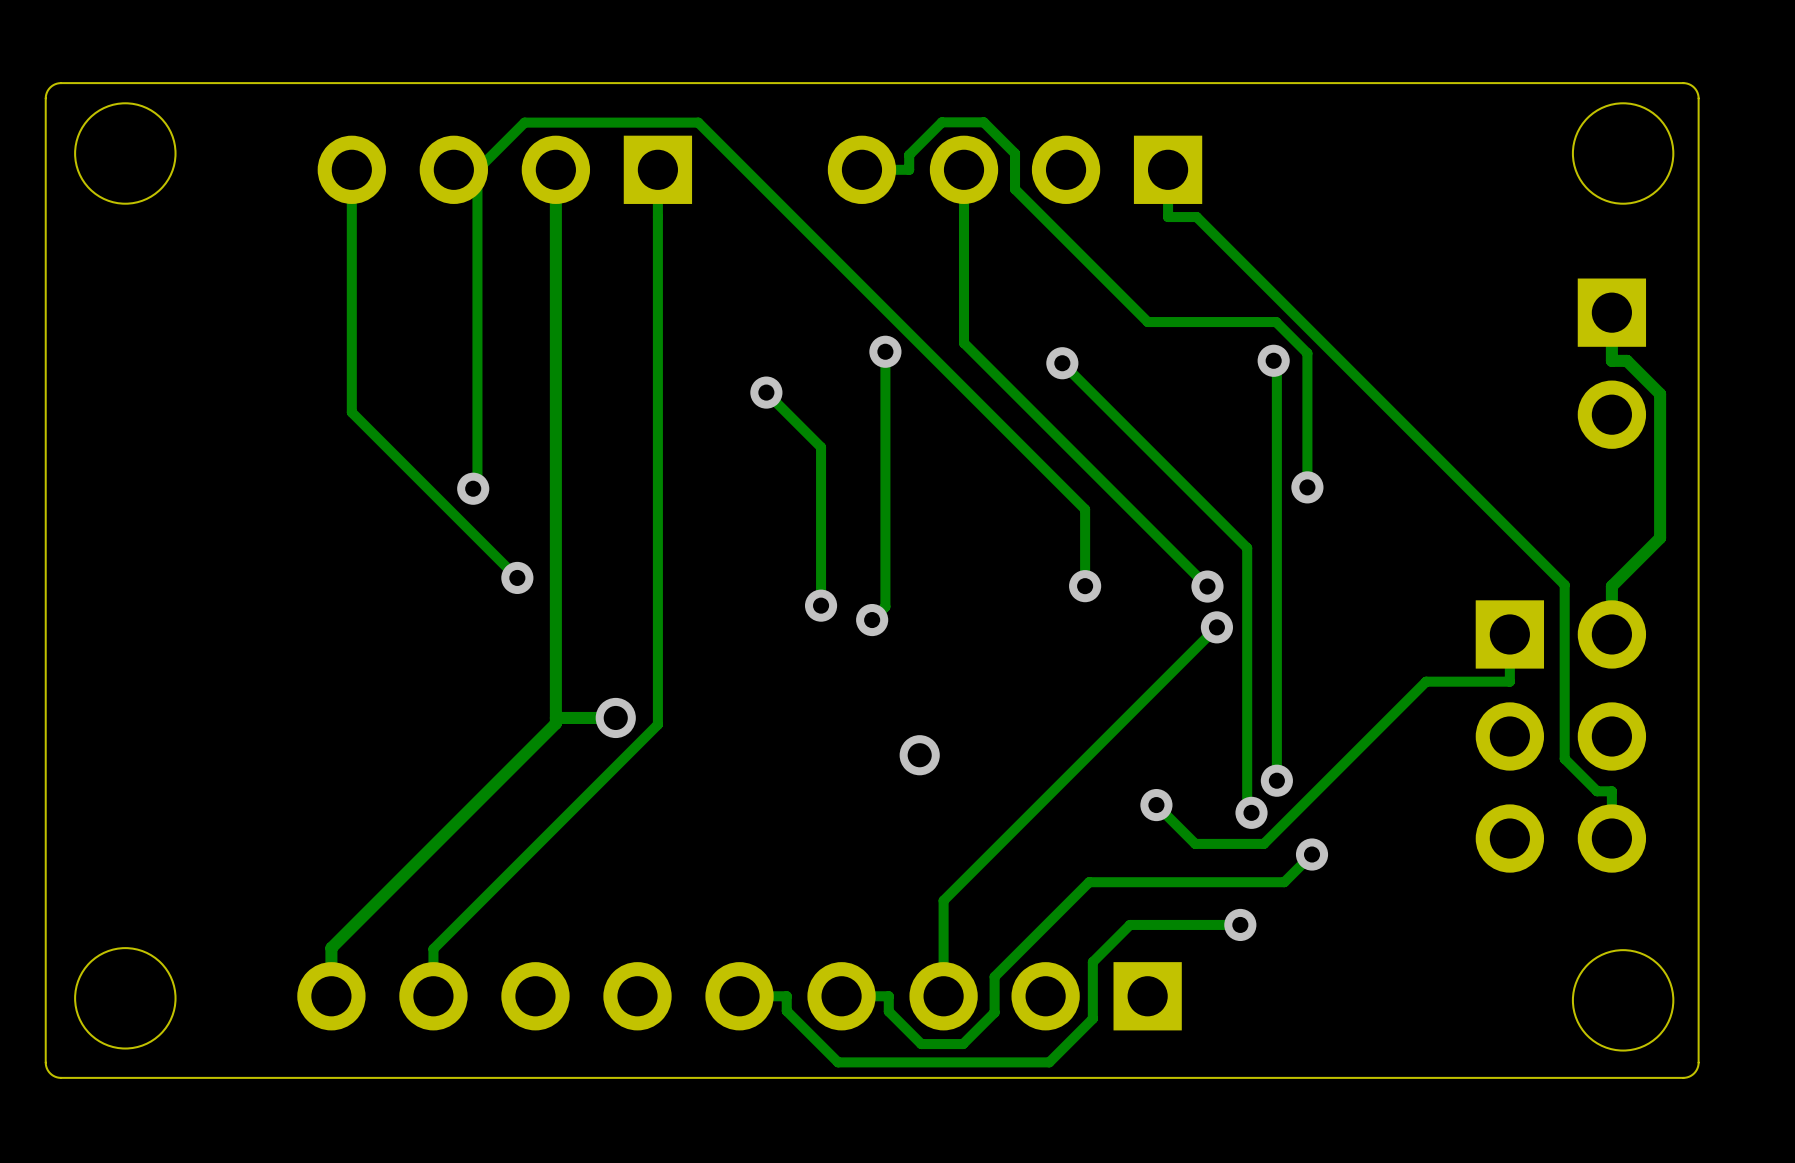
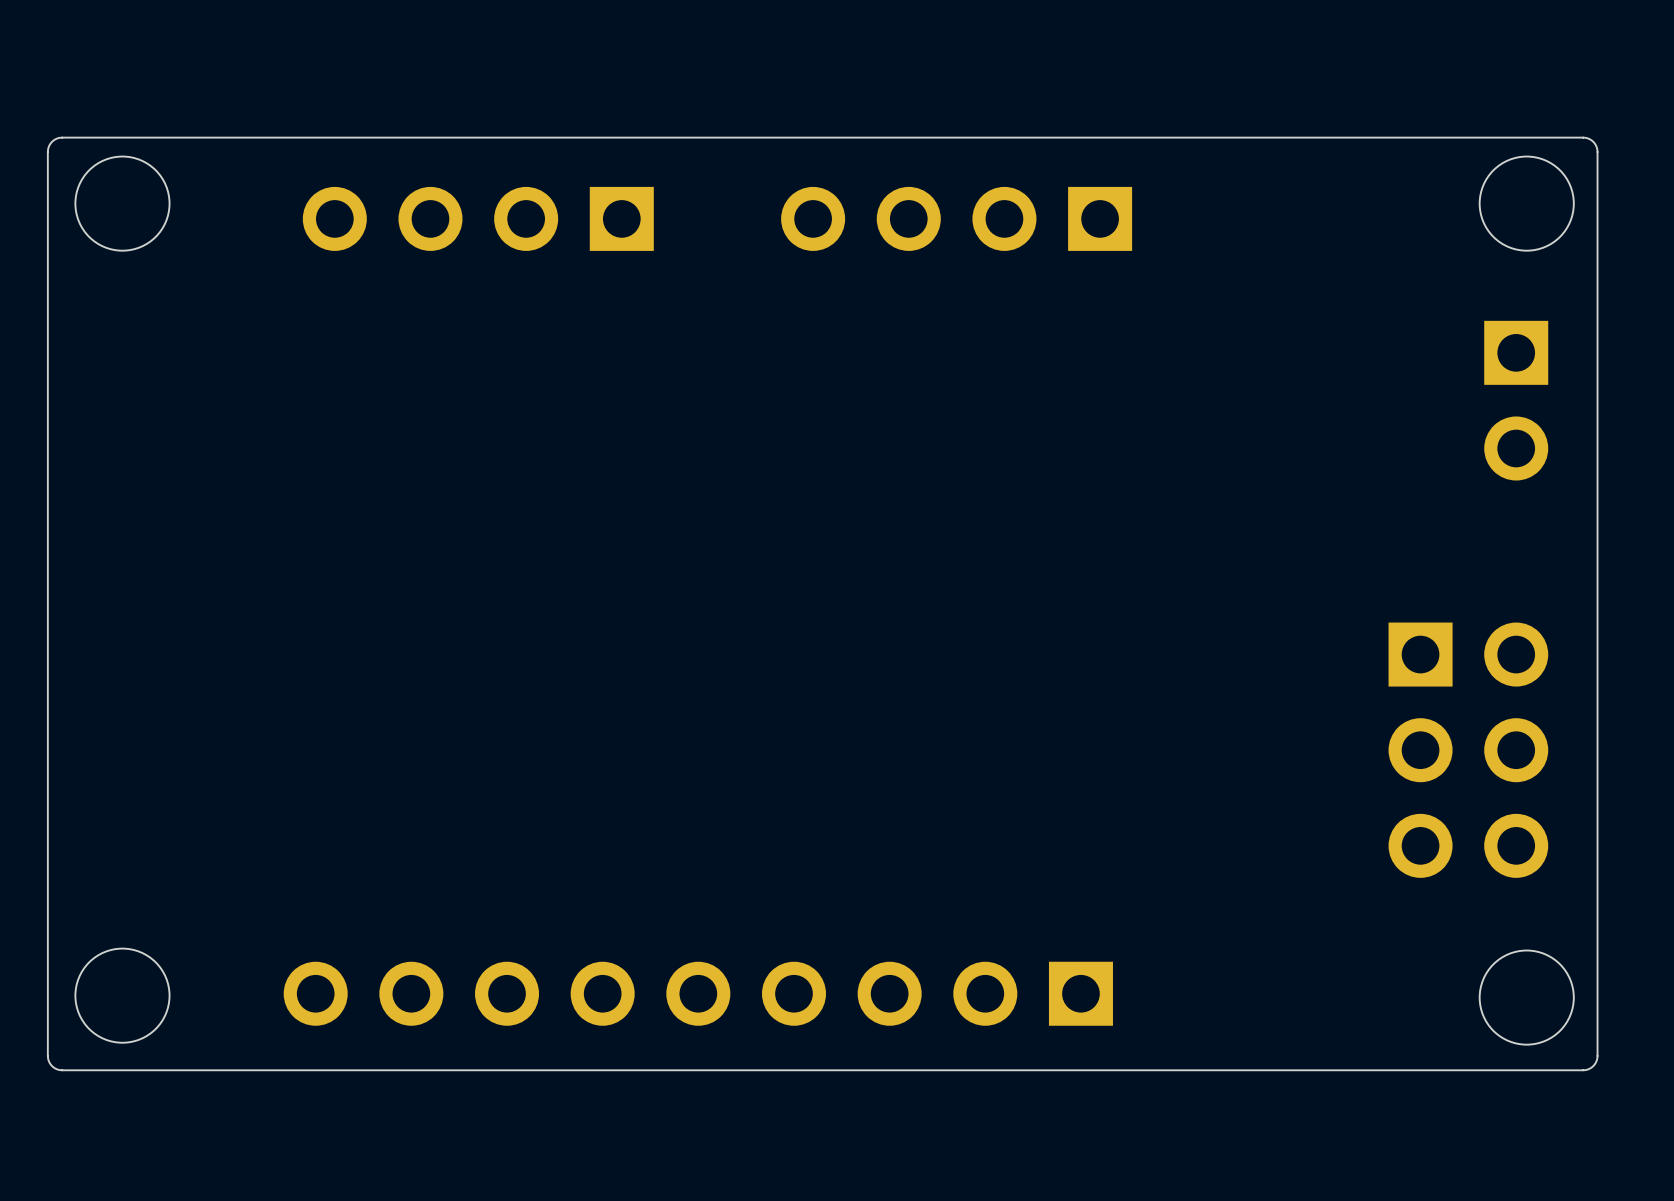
track: (351, 169) (351, 412) (517, 577) -> none
track: (477, 169) (524, 122) (698, 122) (1085, 509) (1085, 586) -> none
track: (477, 169) (477, 484) (473, 488) -> none
track: (555, 169) (555, 723) (331, 948) (331, 996) -> none
track: (657, 169) (657, 724) (433, 949) (433, 996) -> none
track: (861, 169) (909, 169) (909, 155) (941, 122) (983, 122) (1015, 153) (1015, 189) (1147, 322) (1276, 322) (1307, 353) (1307, 487) -> none
track: (964, 169) (964, 343) (1207, 586) -> none
track: (1168, 169) (1168, 217) (1196, 217) (1564, 585) (1564, 758) (1597, 791) (1611, 791) (1611, 838) -> none
track: (1611, 312) (1611, 360) (1626, 360) (1660, 394) (1660, 538) (1611, 586) (1611, 634) -> none
track: (885, 351) (885, 606) (872, 620) -> none
via: (885, 351) -> none
track: (1273, 360) (1276, 363) (1276, 780) -> none
via: (1273, 360) -> none
track: (1062, 363) (1247, 548) (1247, 808) (1251, 812) -> none
via: (1062, 363) -> none
track: (766, 392) (821, 447) (821, 605) -> none
via: (766, 392) -> none
via: (1307, 487) -> none
via: (473, 488) -> none
via: (517, 577) -> none
via: (1085, 586) -> none
via: (1207, 586) -> none
via: (821, 605) -> none
via: (872, 620) -> none
track: (1216, 627) (943, 900) (943, 996) -> none
via: (1216, 627) -> none
track: (1509, 634) (1509, 681) (1426, 681) (1263, 843) (1195, 843) (1156, 805) -> none
track: (615, 717) (555, 717) -> none
via: (615, 717) -> none
via: (919, 755) -> none
via: (1276, 780) -> none
via: (1156, 805) -> none
via: (1251, 812) -> none
track: (1312, 854) (1284, 882) (1089, 882) (994, 976) (994, 1012) (963, 1044) (921, 1044) (888, 1011) (888, 996) (841, 996) -> none
via: (1312, 854) -> none
track: (1240, 924) (1130, 924) (1092, 962) (1092, 1018) (1049, 1062) (838, 1062) (786, 1011) (786, 996) (739, 996) -> none
via: (1240, 924) -> none

